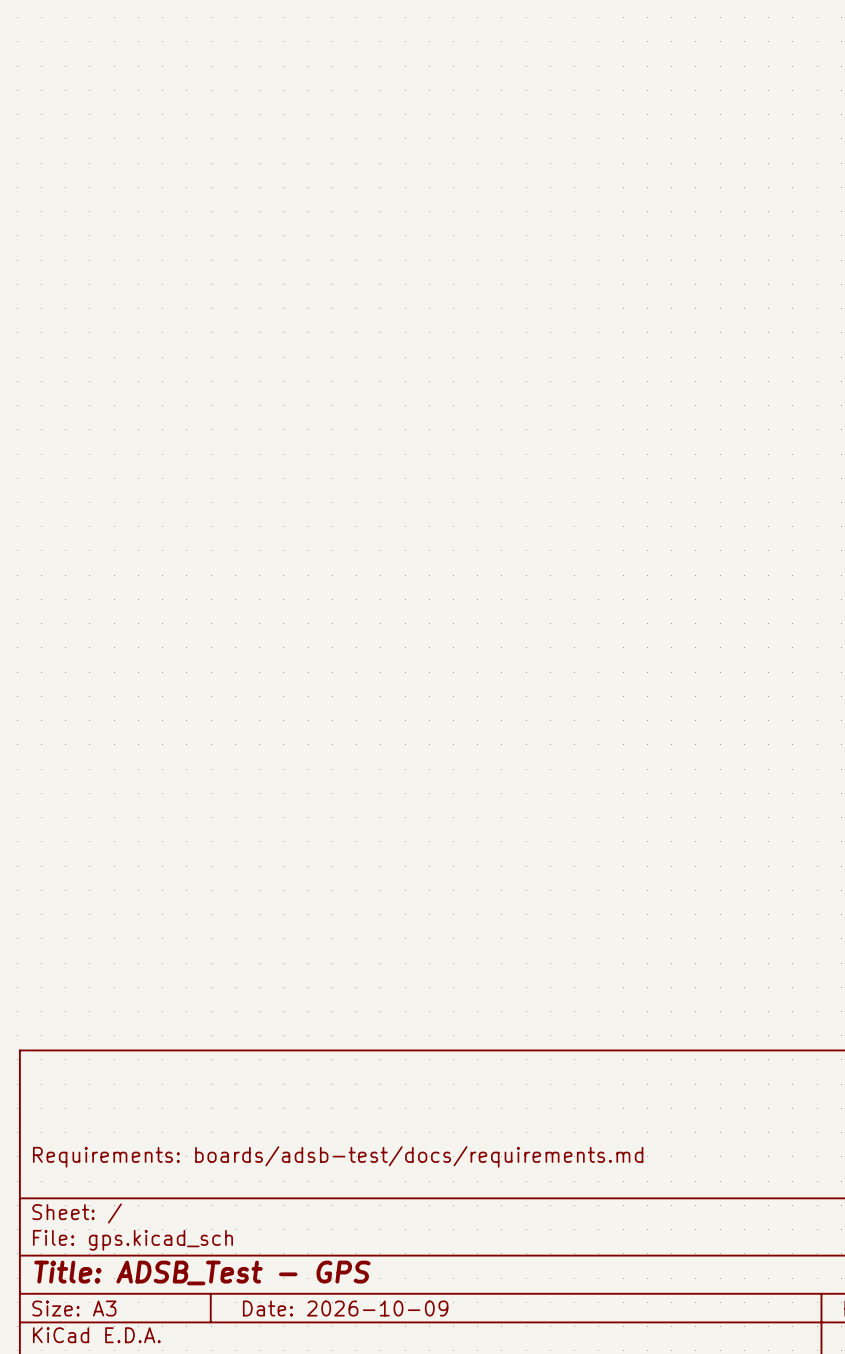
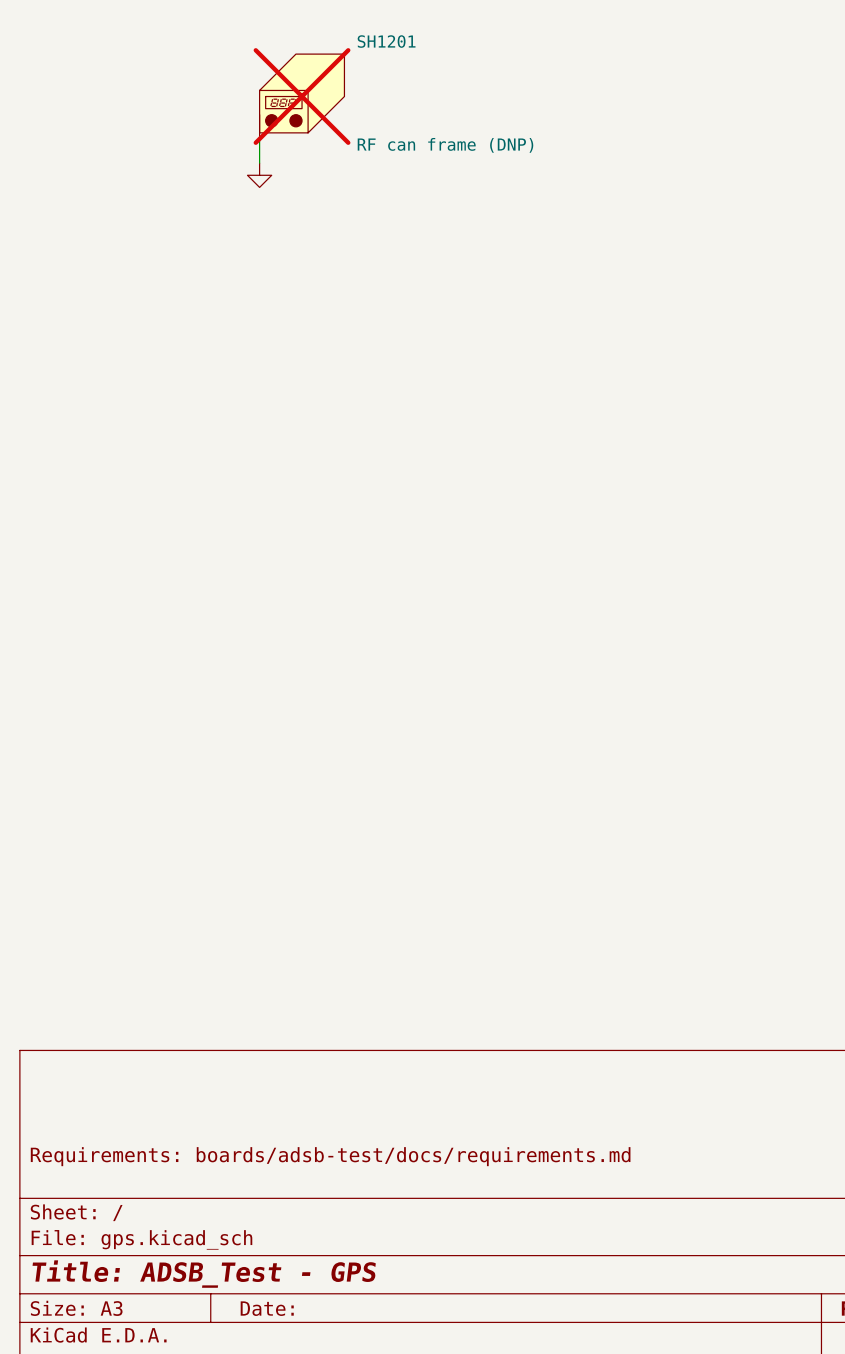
SH1201: none -> RF can frame (DNP) (302, 96)
wire: none -> (259, 138) (259, 163)
power symbol: none -> (259, 175)
title block: Date: 2026-10-09 (345, 1308) -> Date: (267, 1308)

